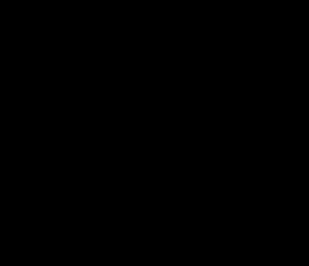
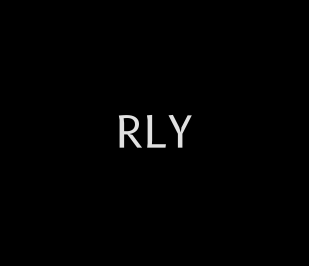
text: none -> RLY (155, 131)

